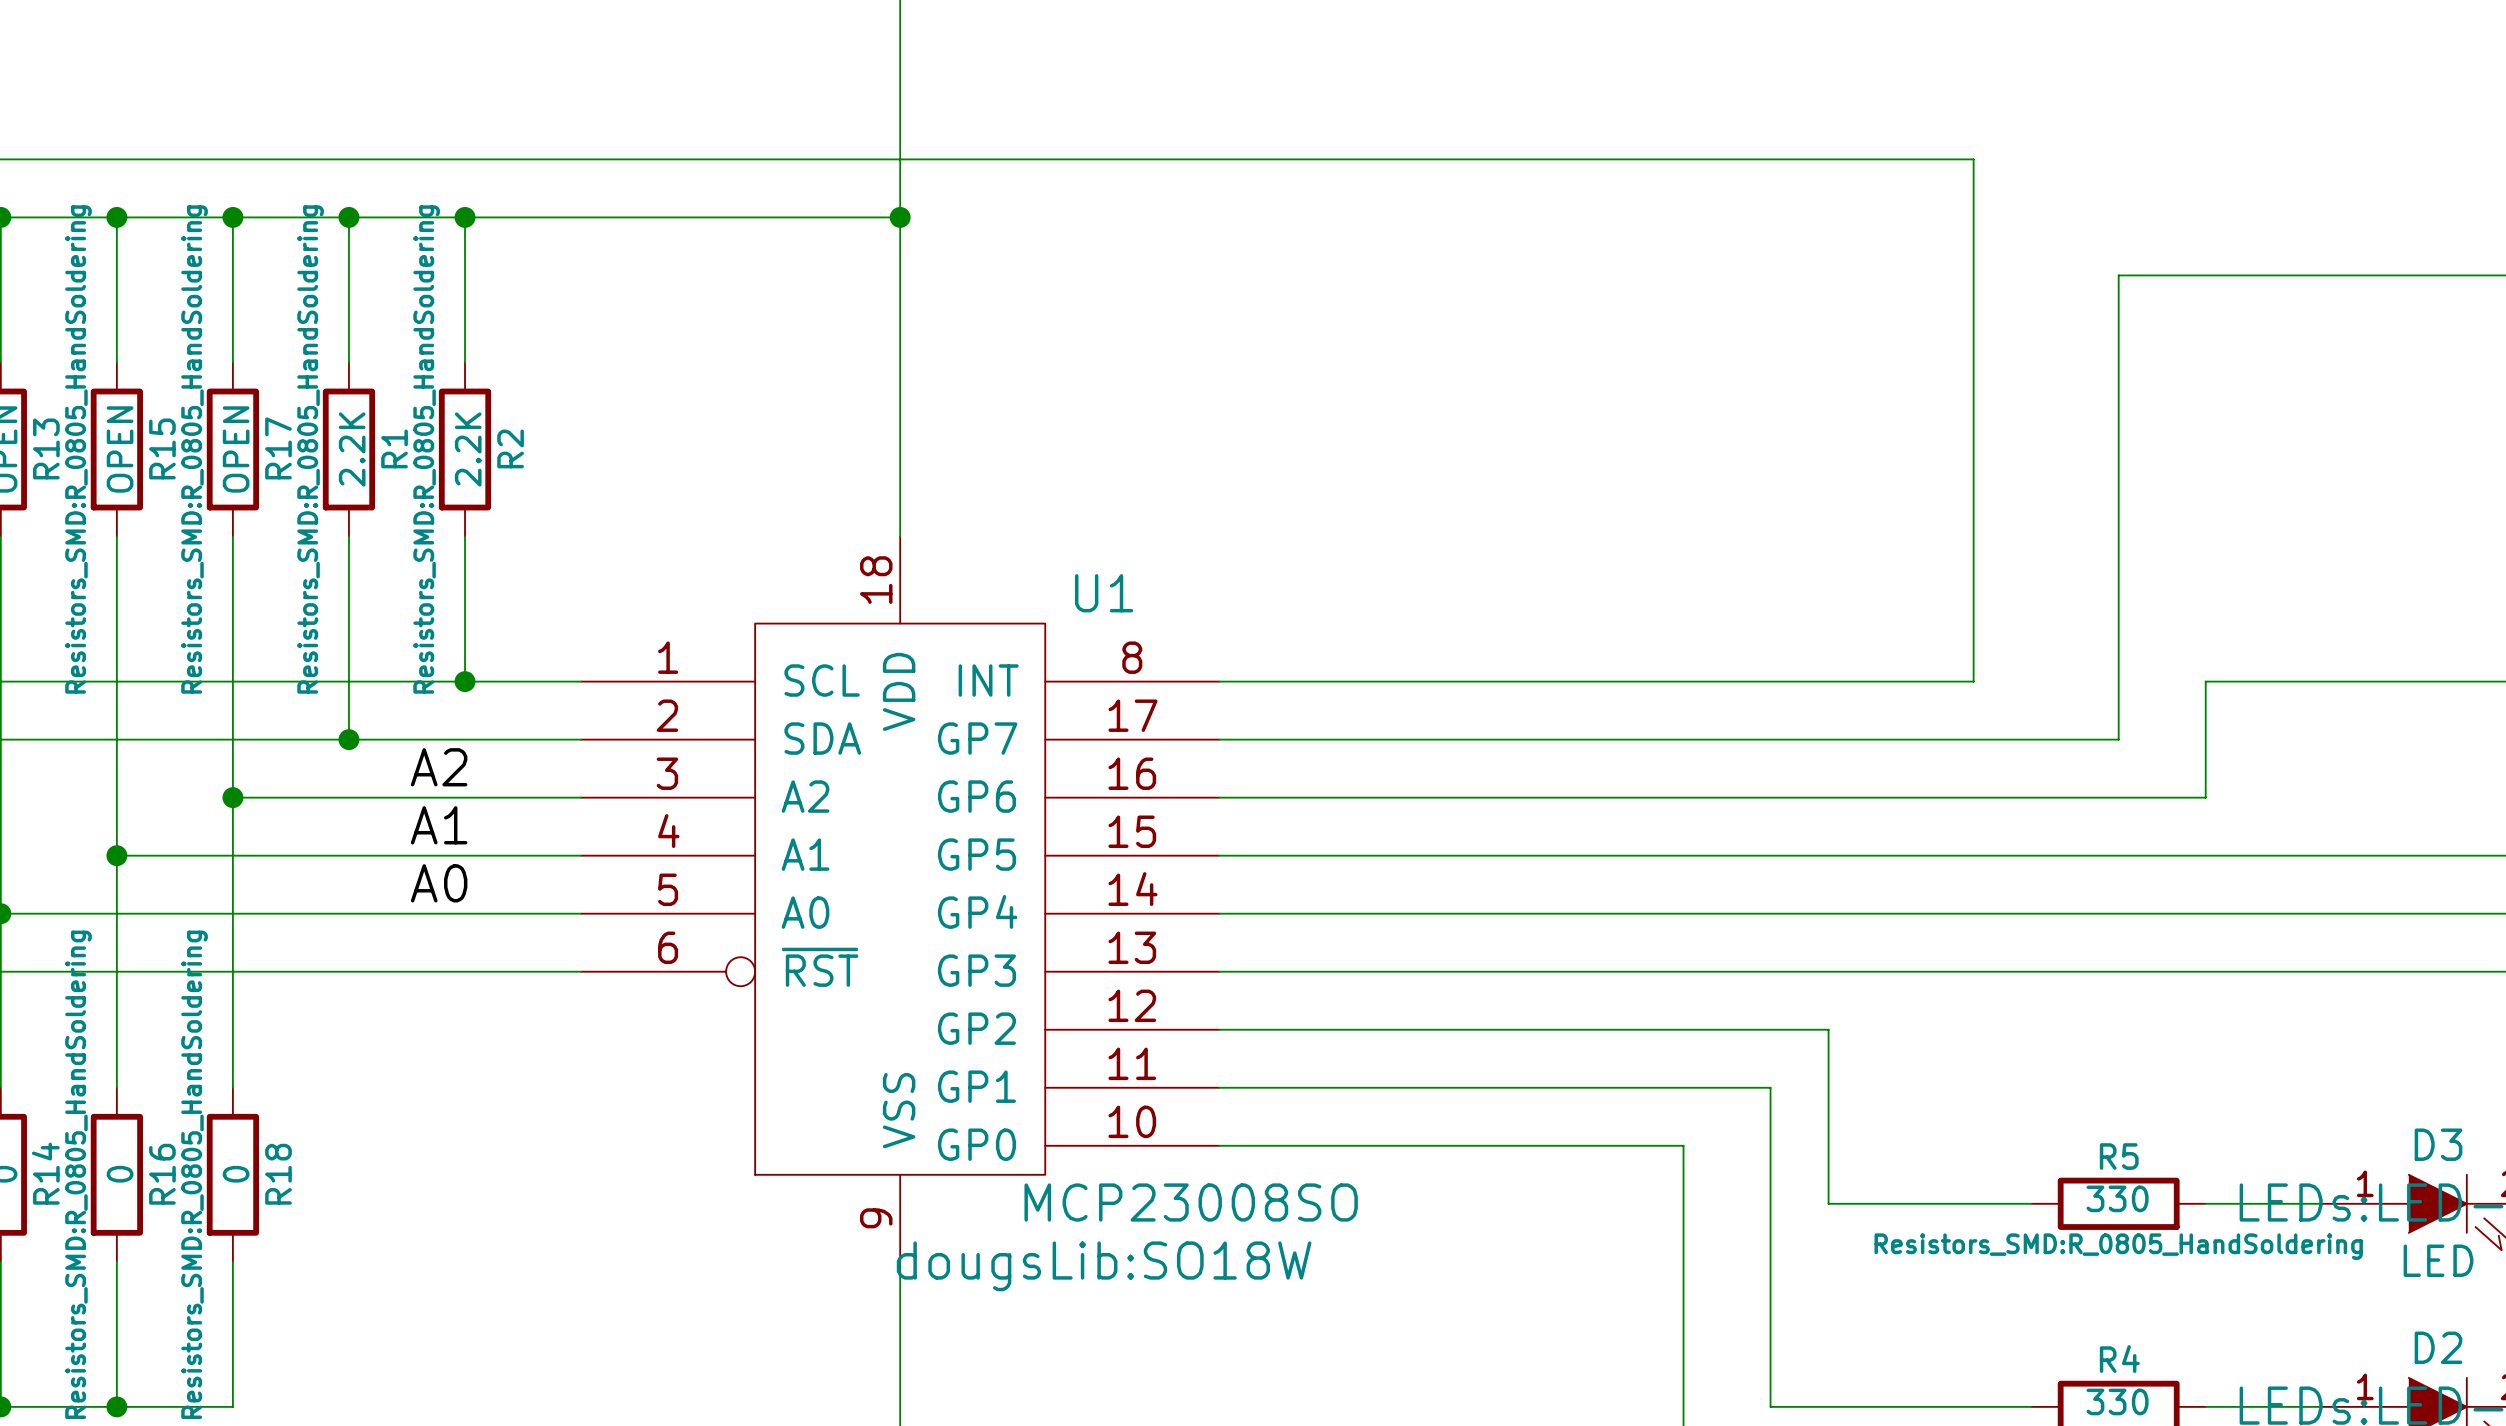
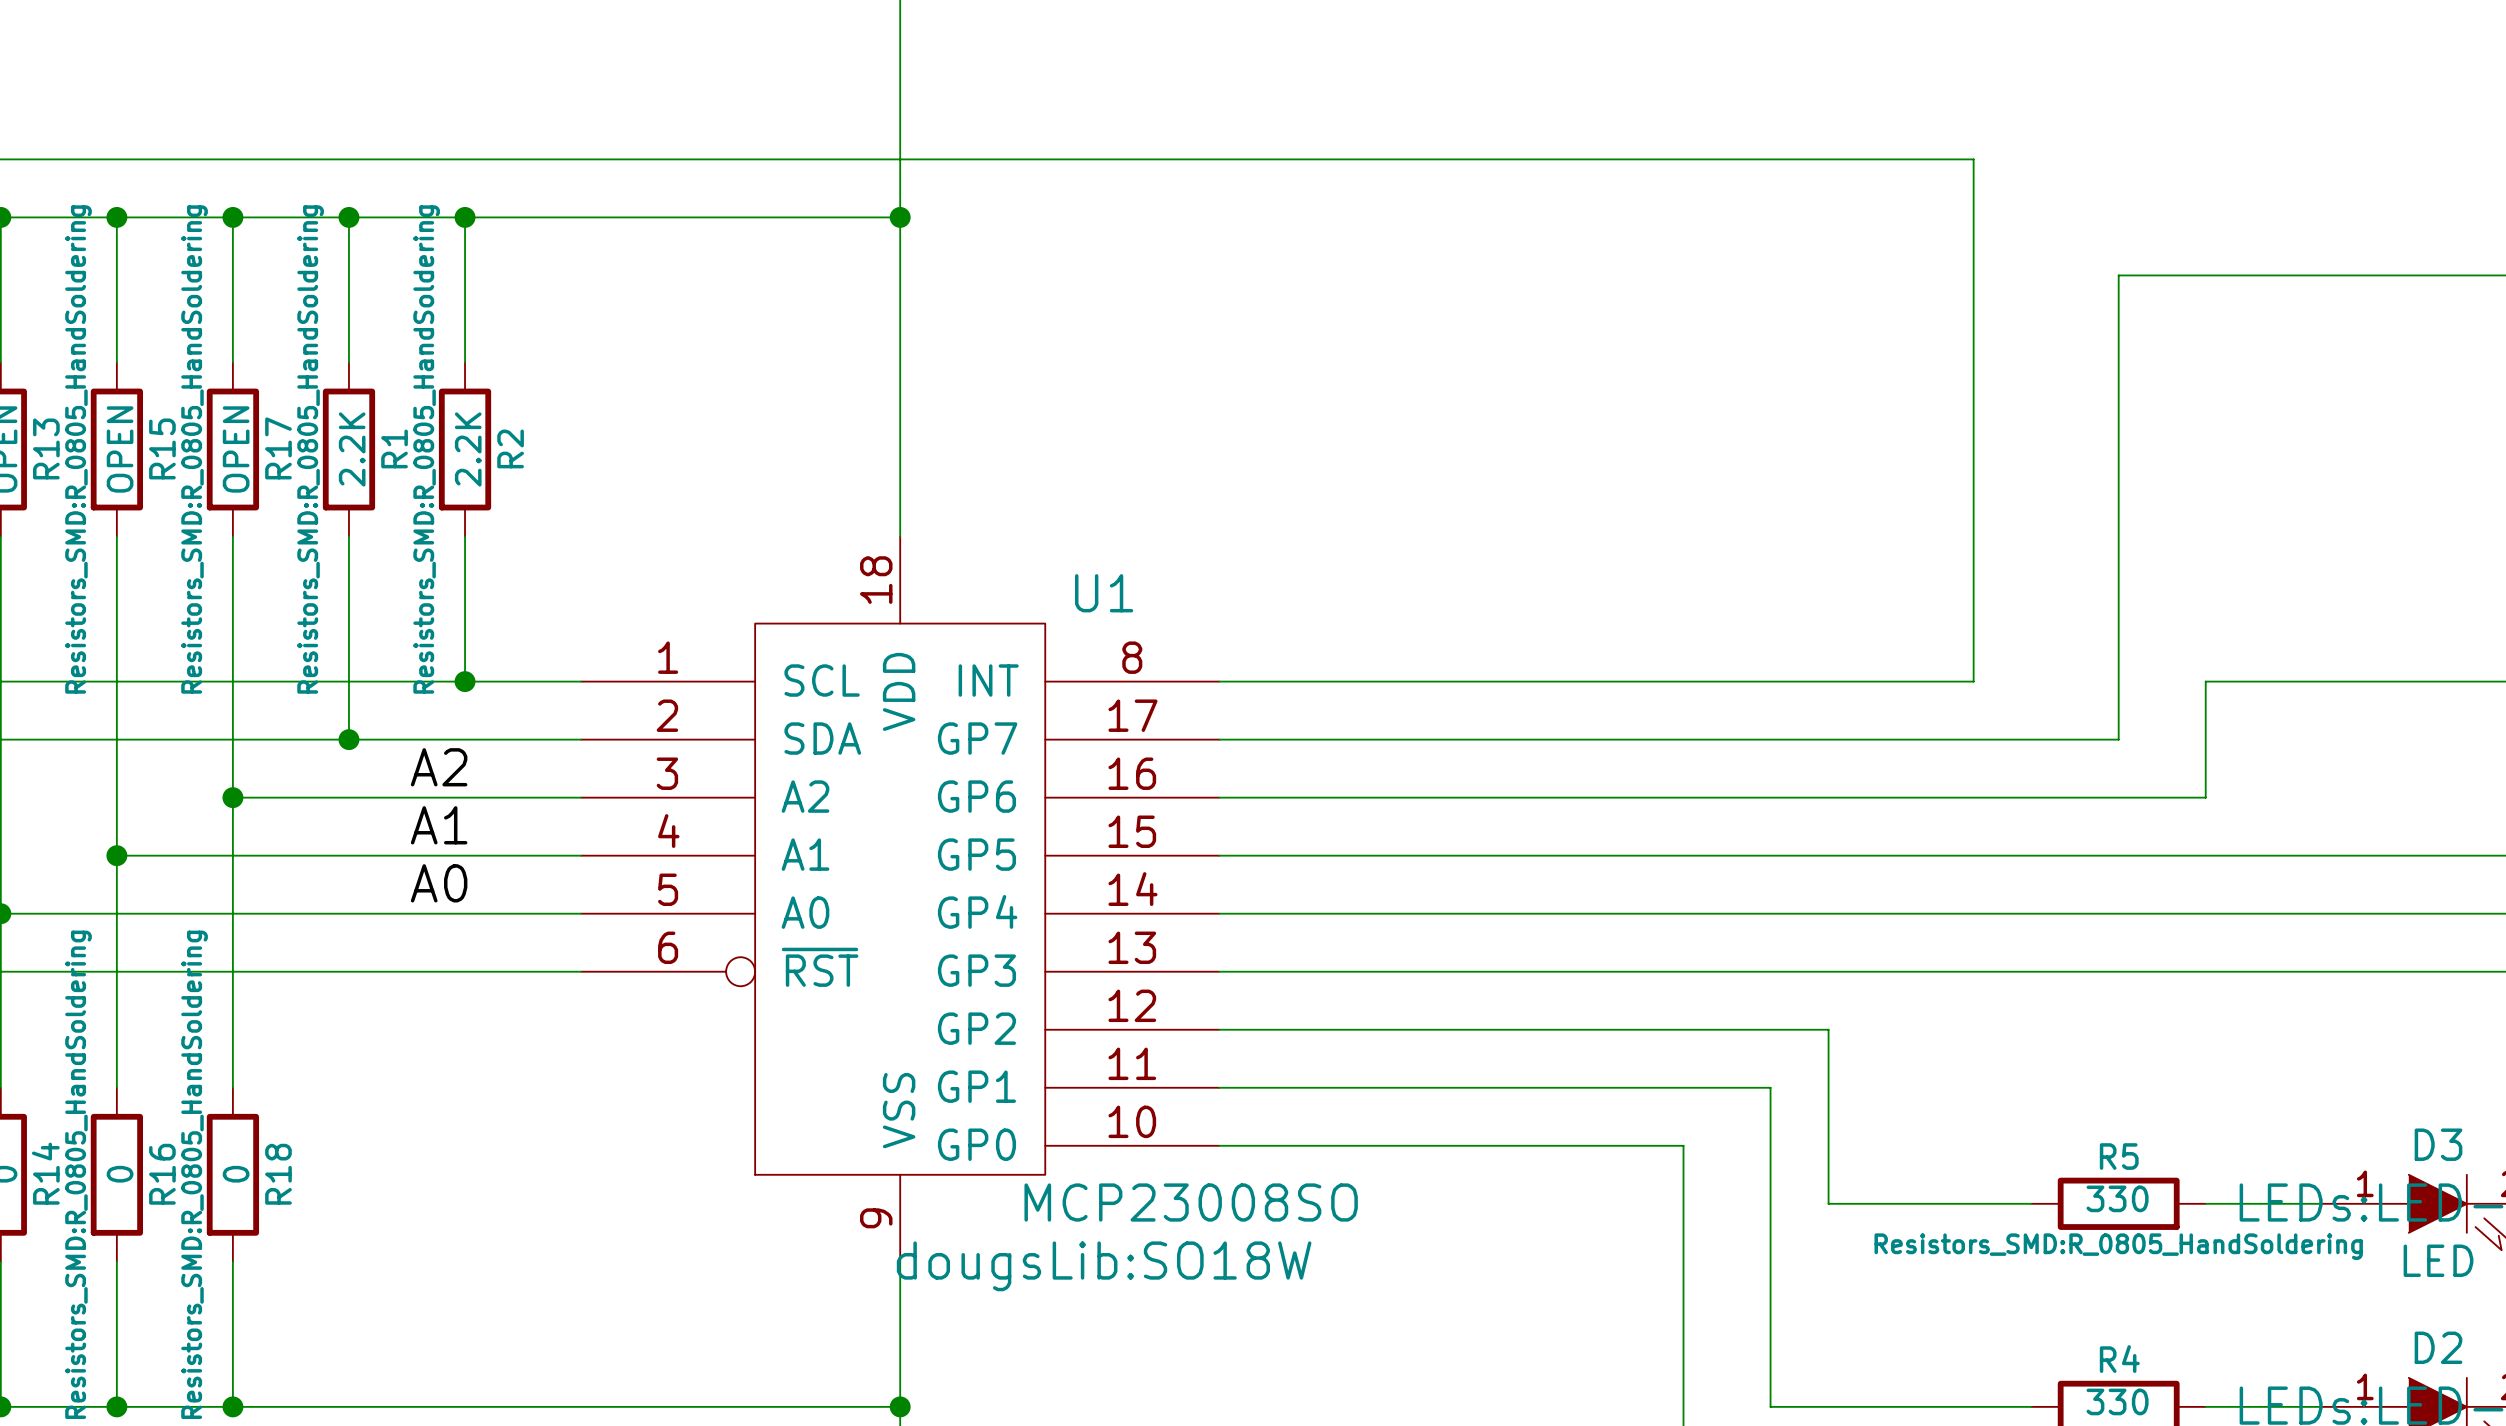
wire: none -> (232, 1406) (900, 1406)
junction: none -> (232, 1406)
junction: none -> (900, 1406)

